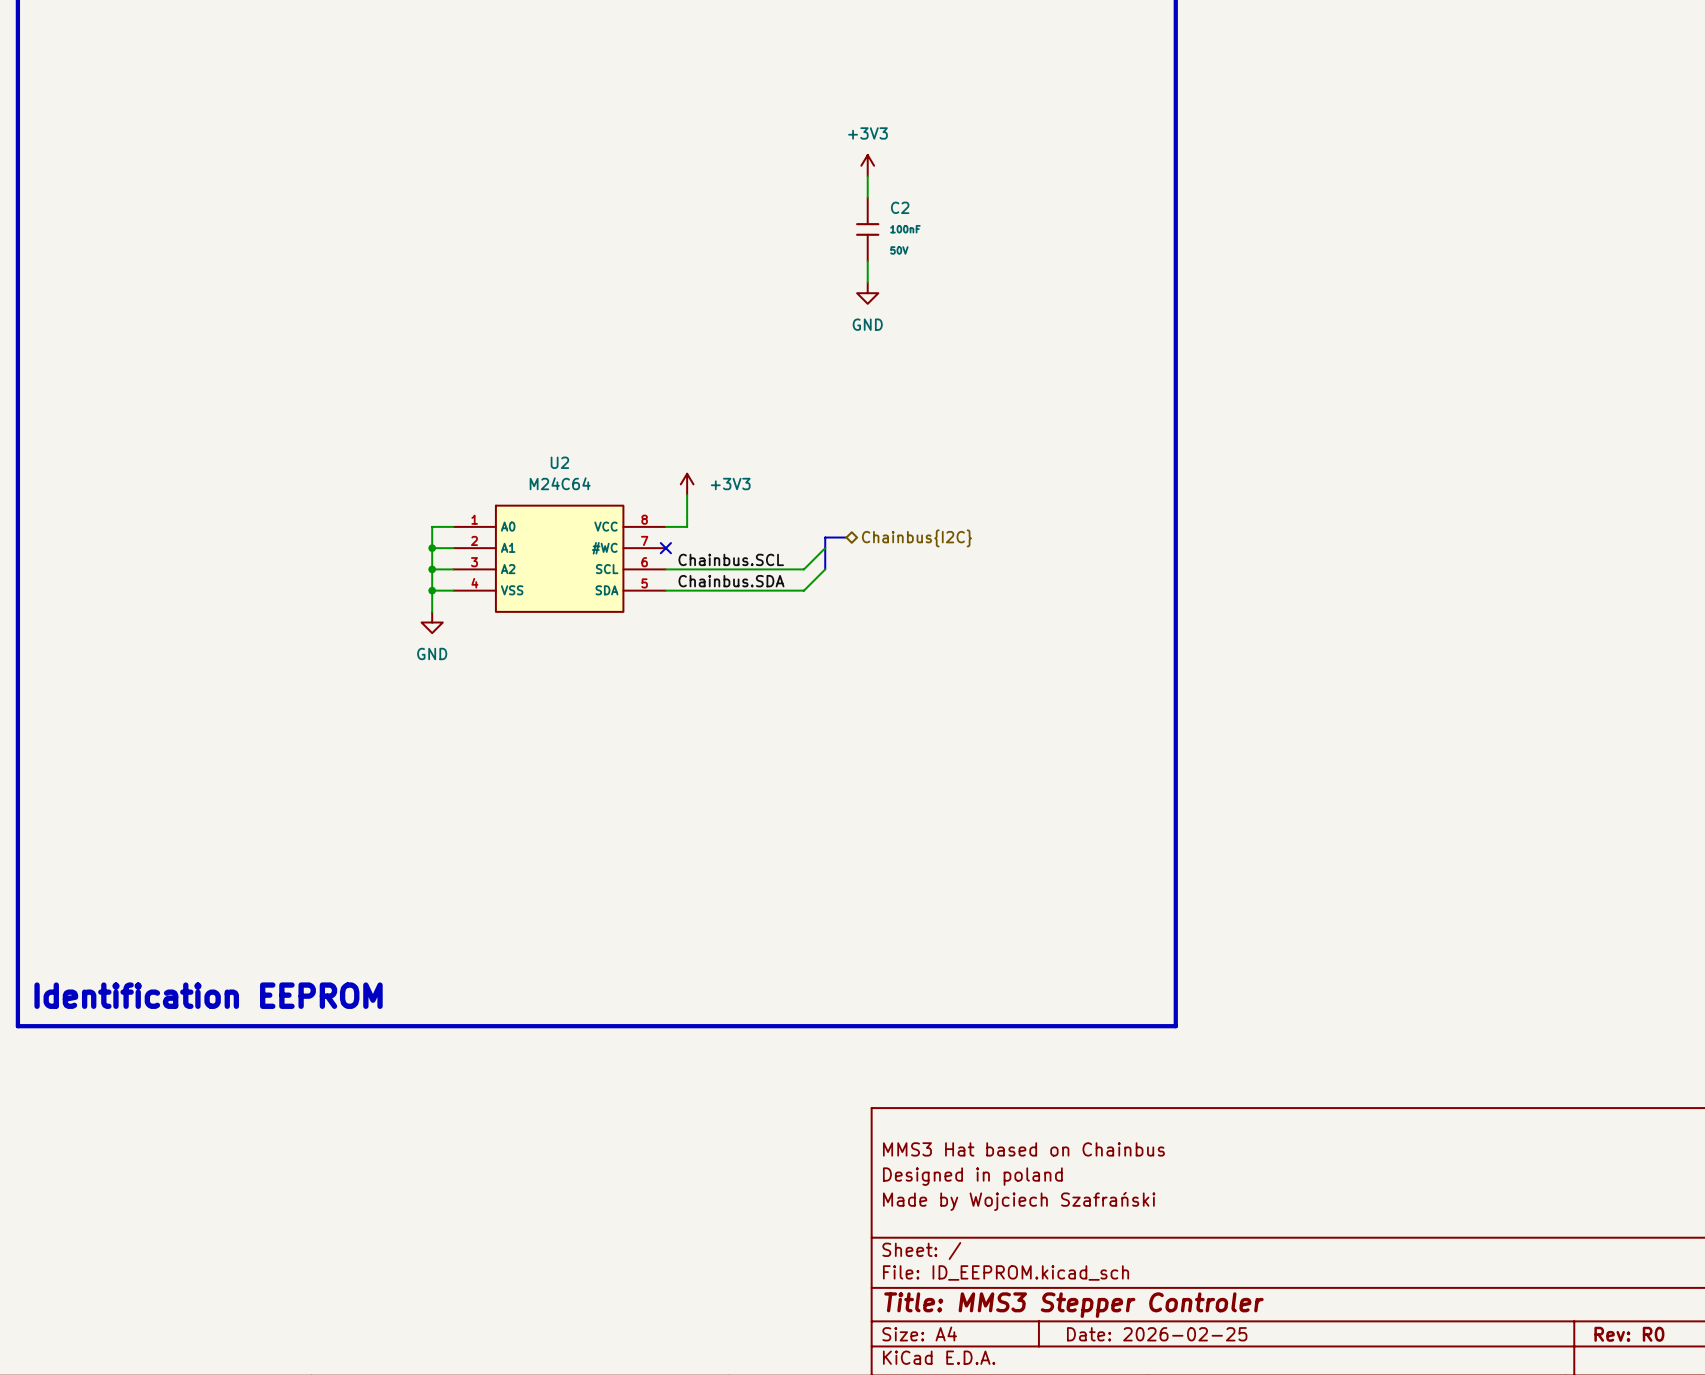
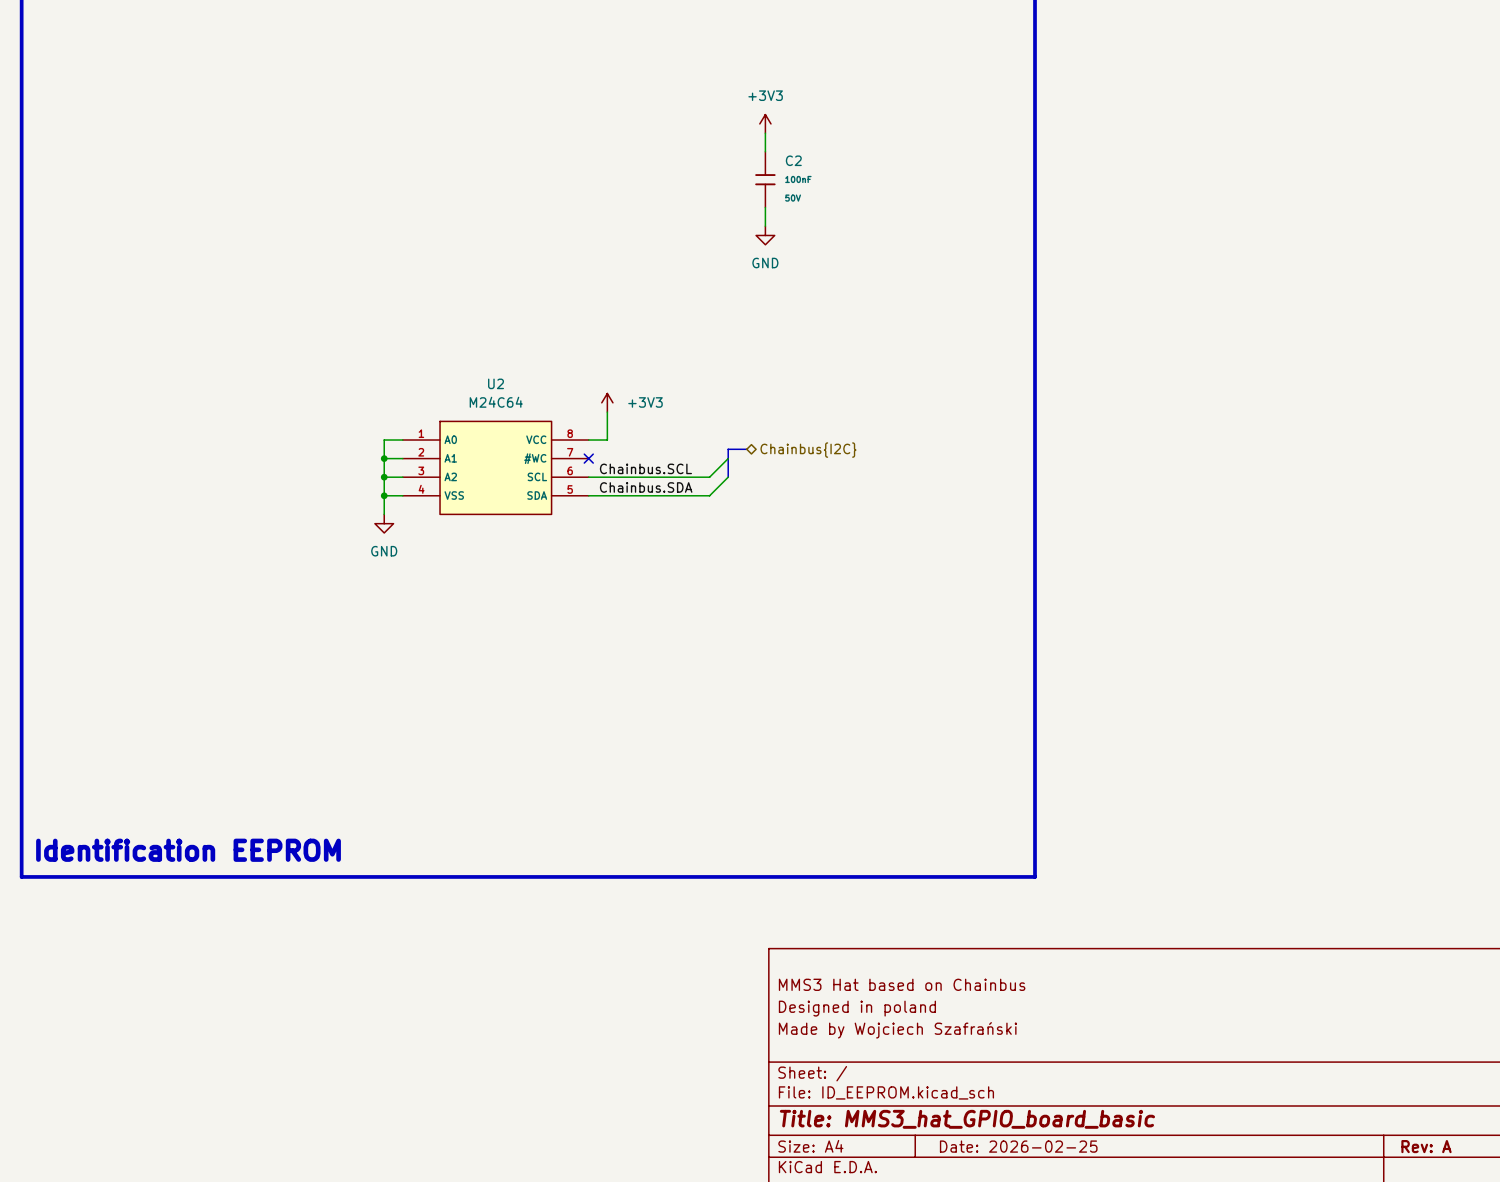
title block: Title: MMS3 Stepper Controler (1073, 1305) -> Title: MMS3_hat_GPIO_board_basic (967, 1119)
title block: Rev: R0 (1629, 1334) -> Rev: A (1426, 1146)

